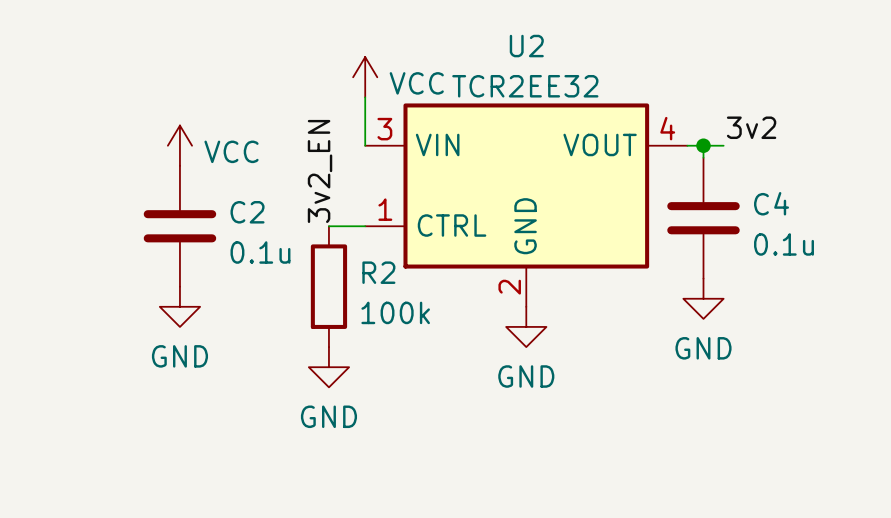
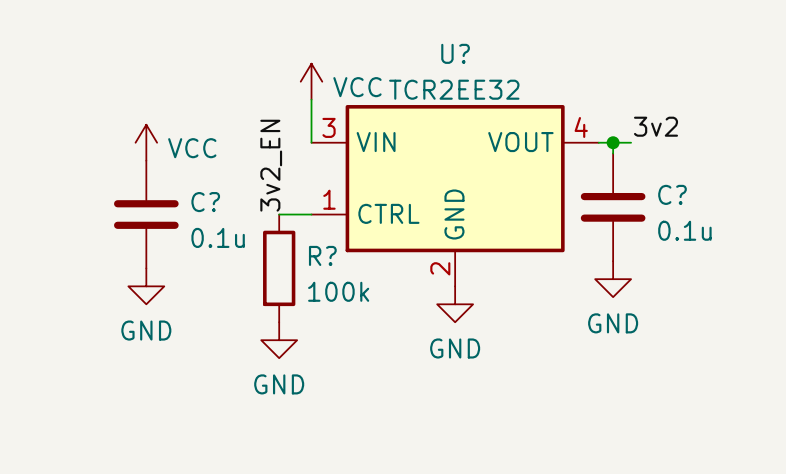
U2 name: U2 (526, 46) -> U? (455, 53)
C4 name: C4 (771, 203) -> C? (672, 194)
C2 name: C2 (247, 212) -> C? (205, 202)
R2 name: R2 (378, 272) -> R? (322, 255)

